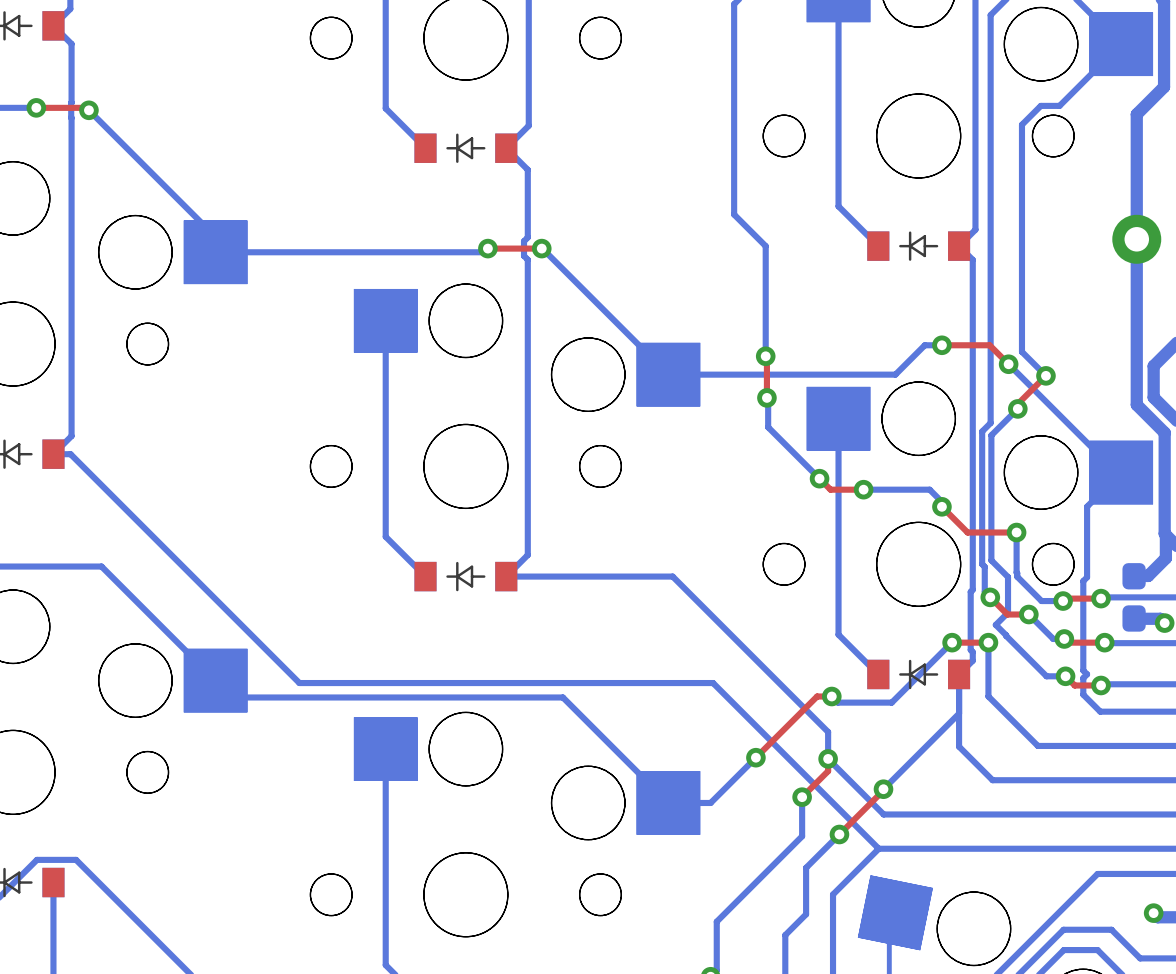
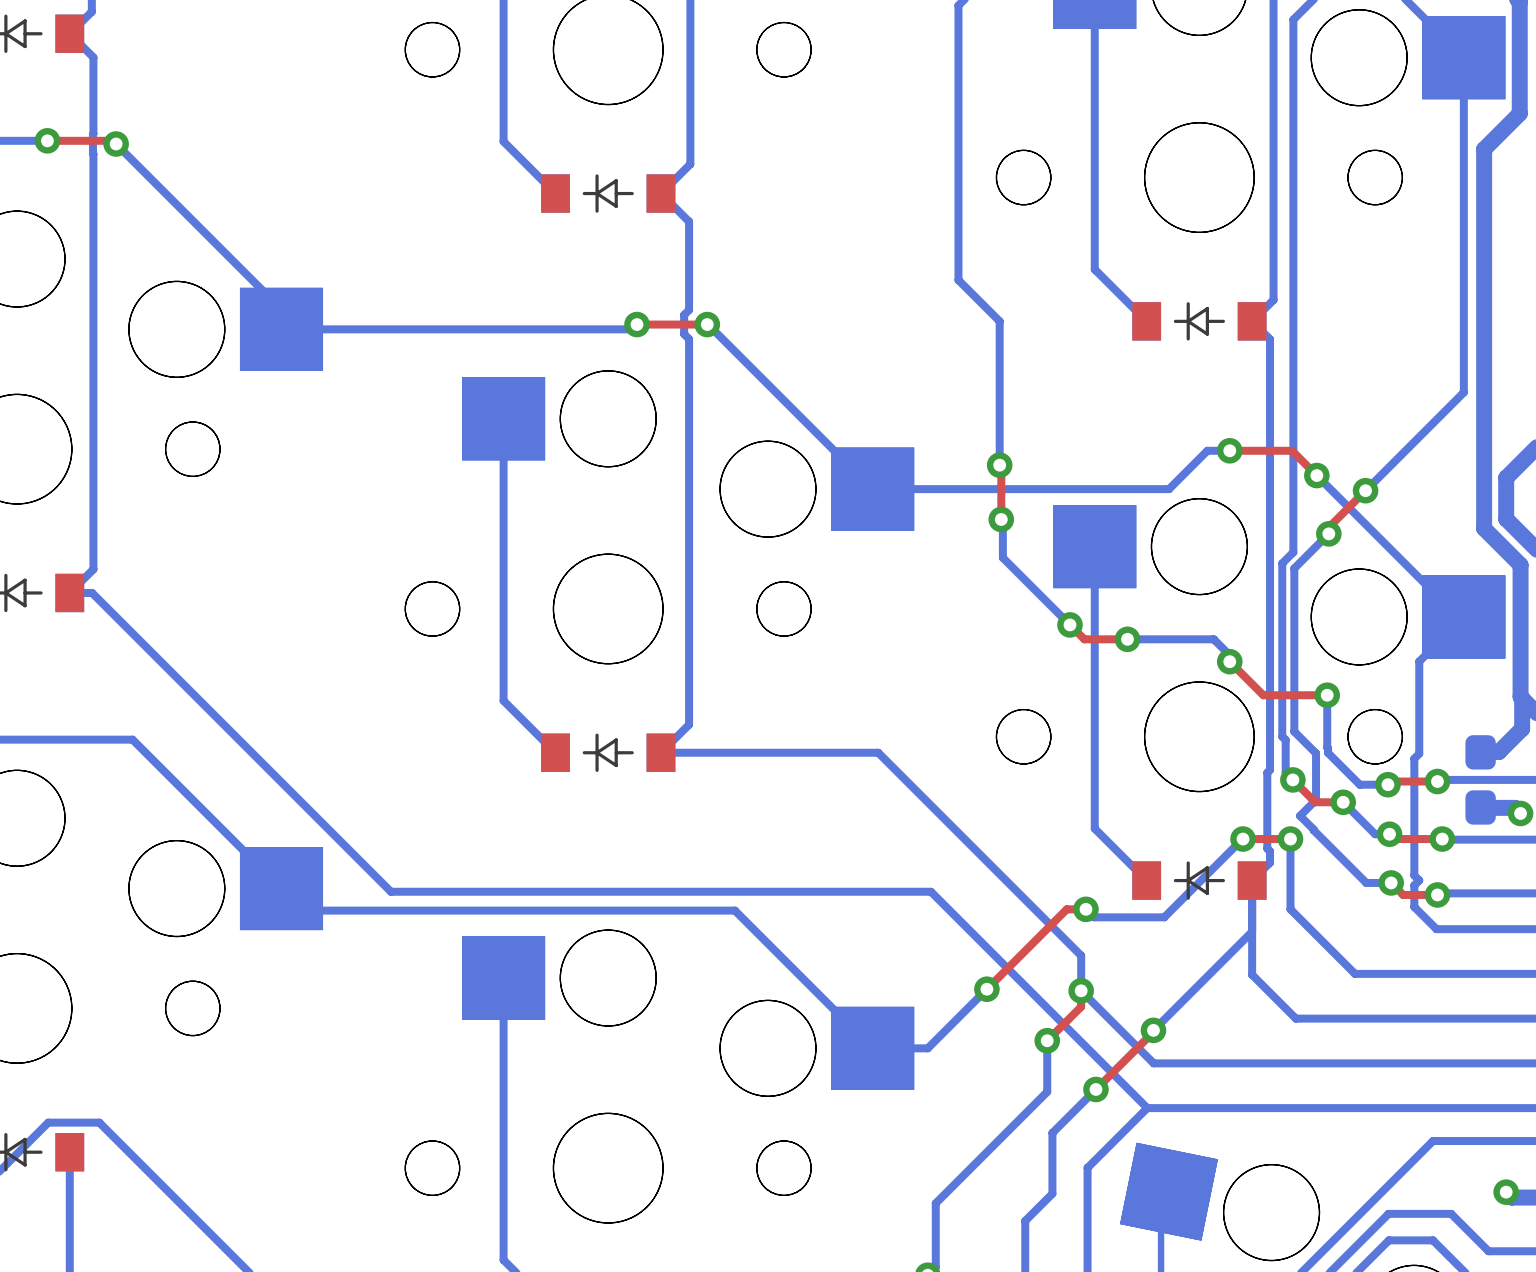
bottom track: (1121, 44) (1059, 105) (1040, 105) (1021, 124) (1021, 351) (1045, 375) -> (1463, 57) (1463, 392) (1365, 490)
part: (1136, 239) -> none

